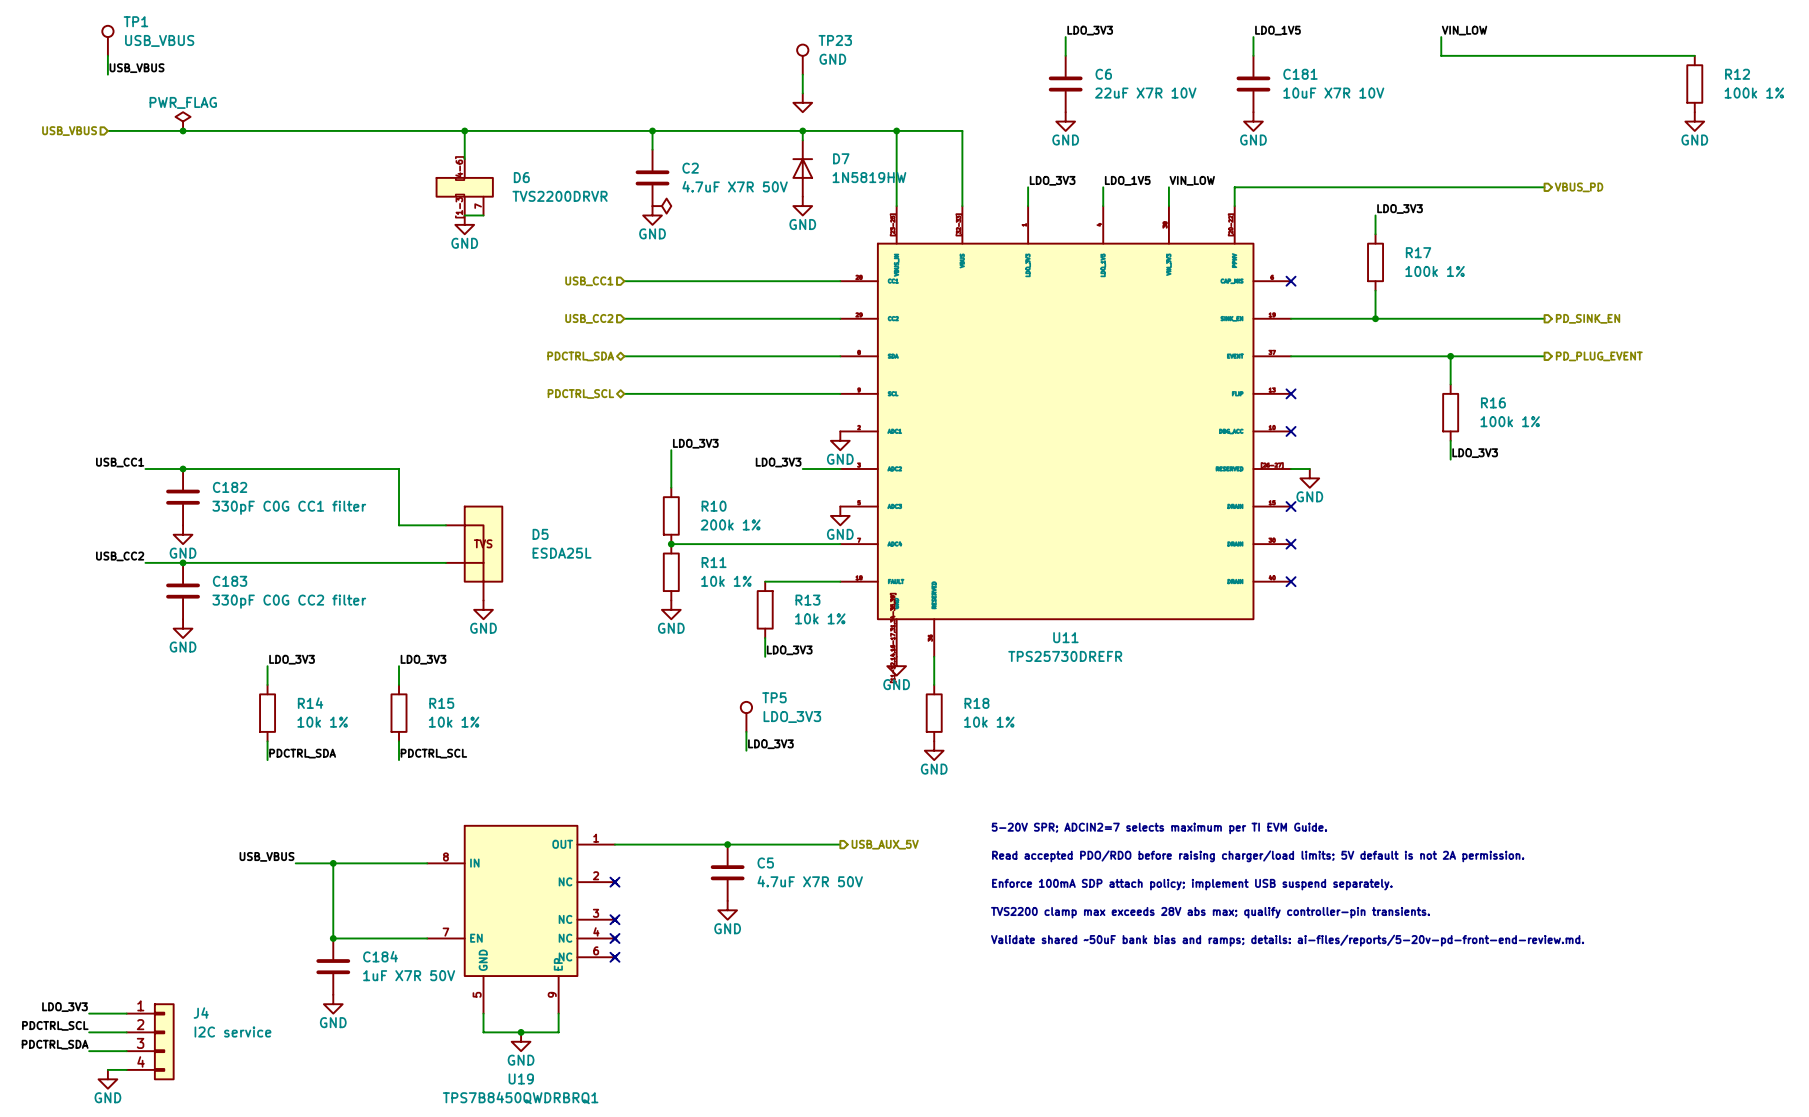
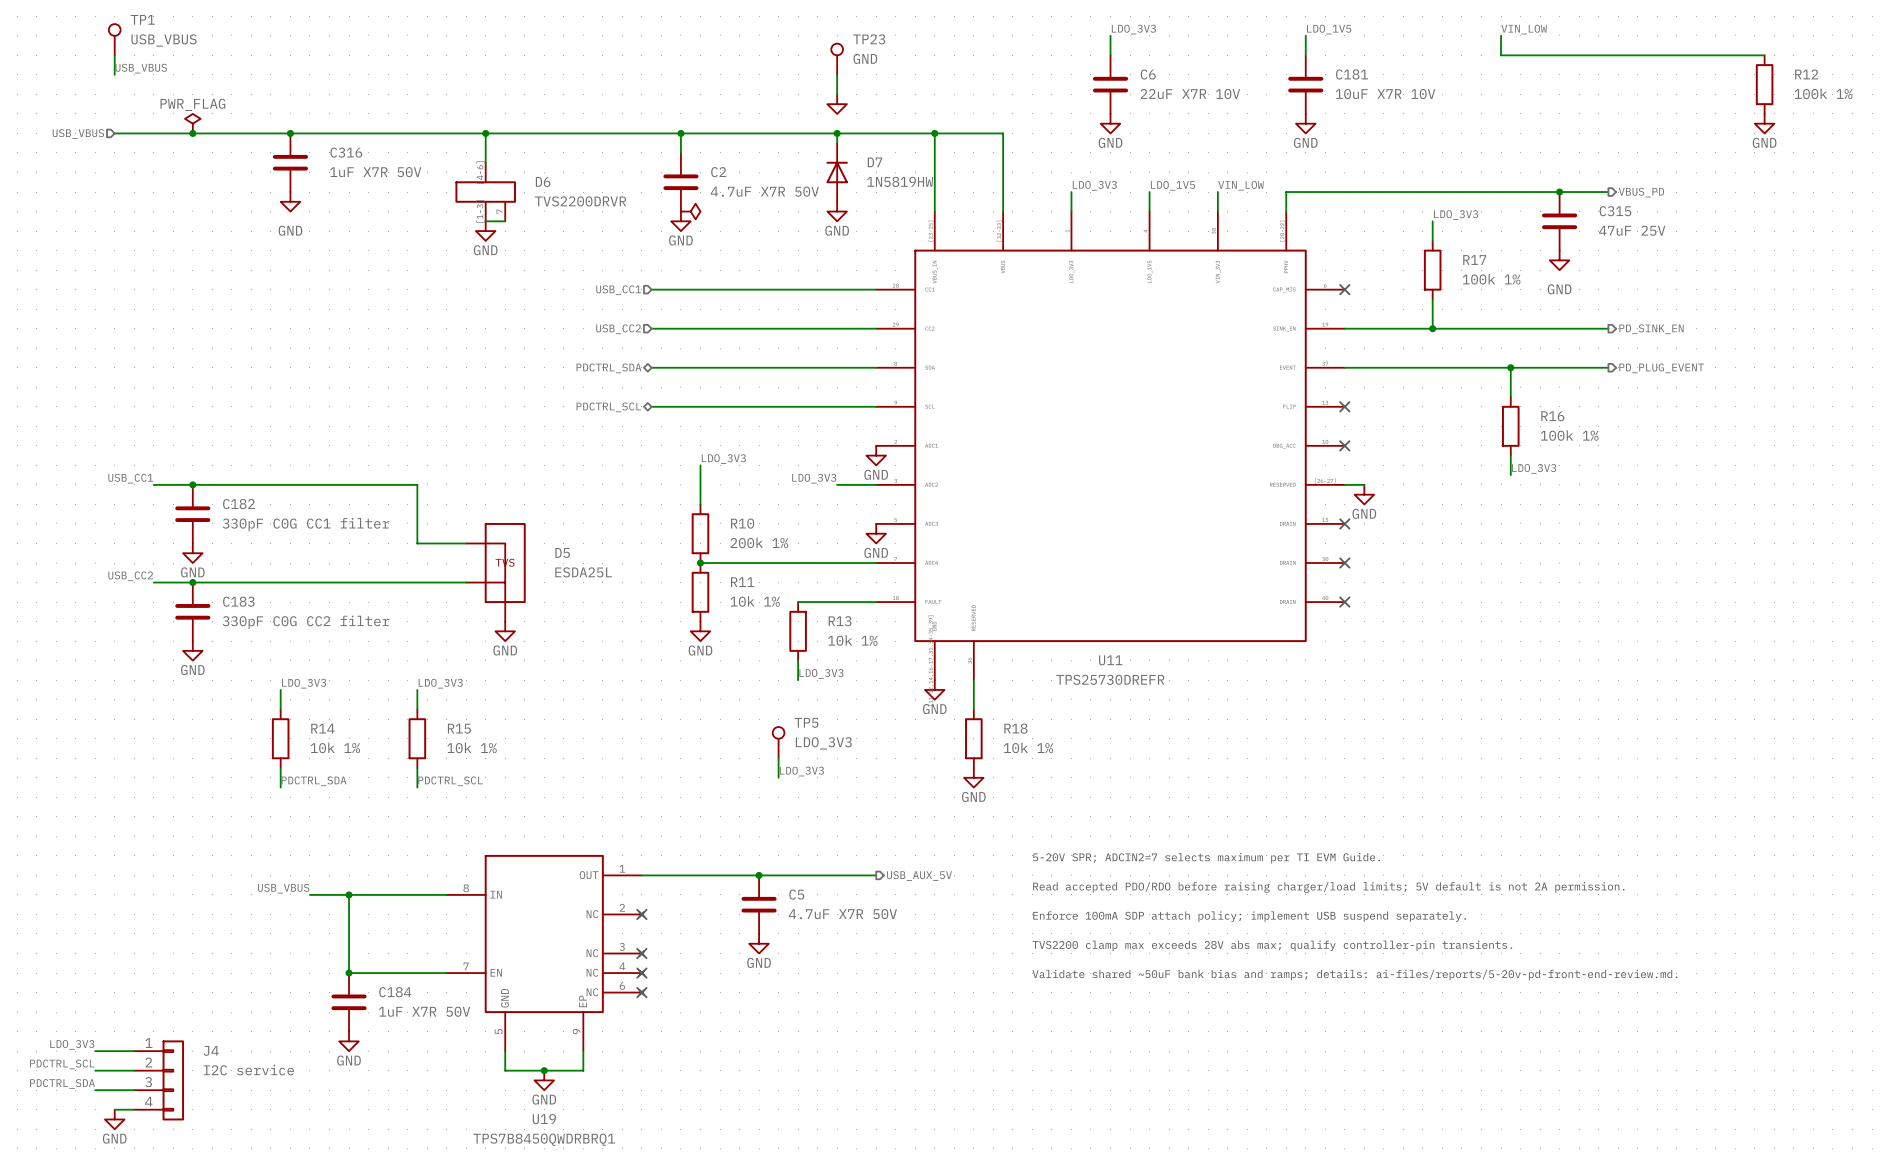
junction: none -> (290, 133)
C316: none -> 1uF X7R 50V (290, 162)
junction: none -> (1559, 192)
power symbol: none -> GND (290, 201)
C315: none -> 47uF 25V (1559, 221)
power symbol: none -> GND (1559, 260)

